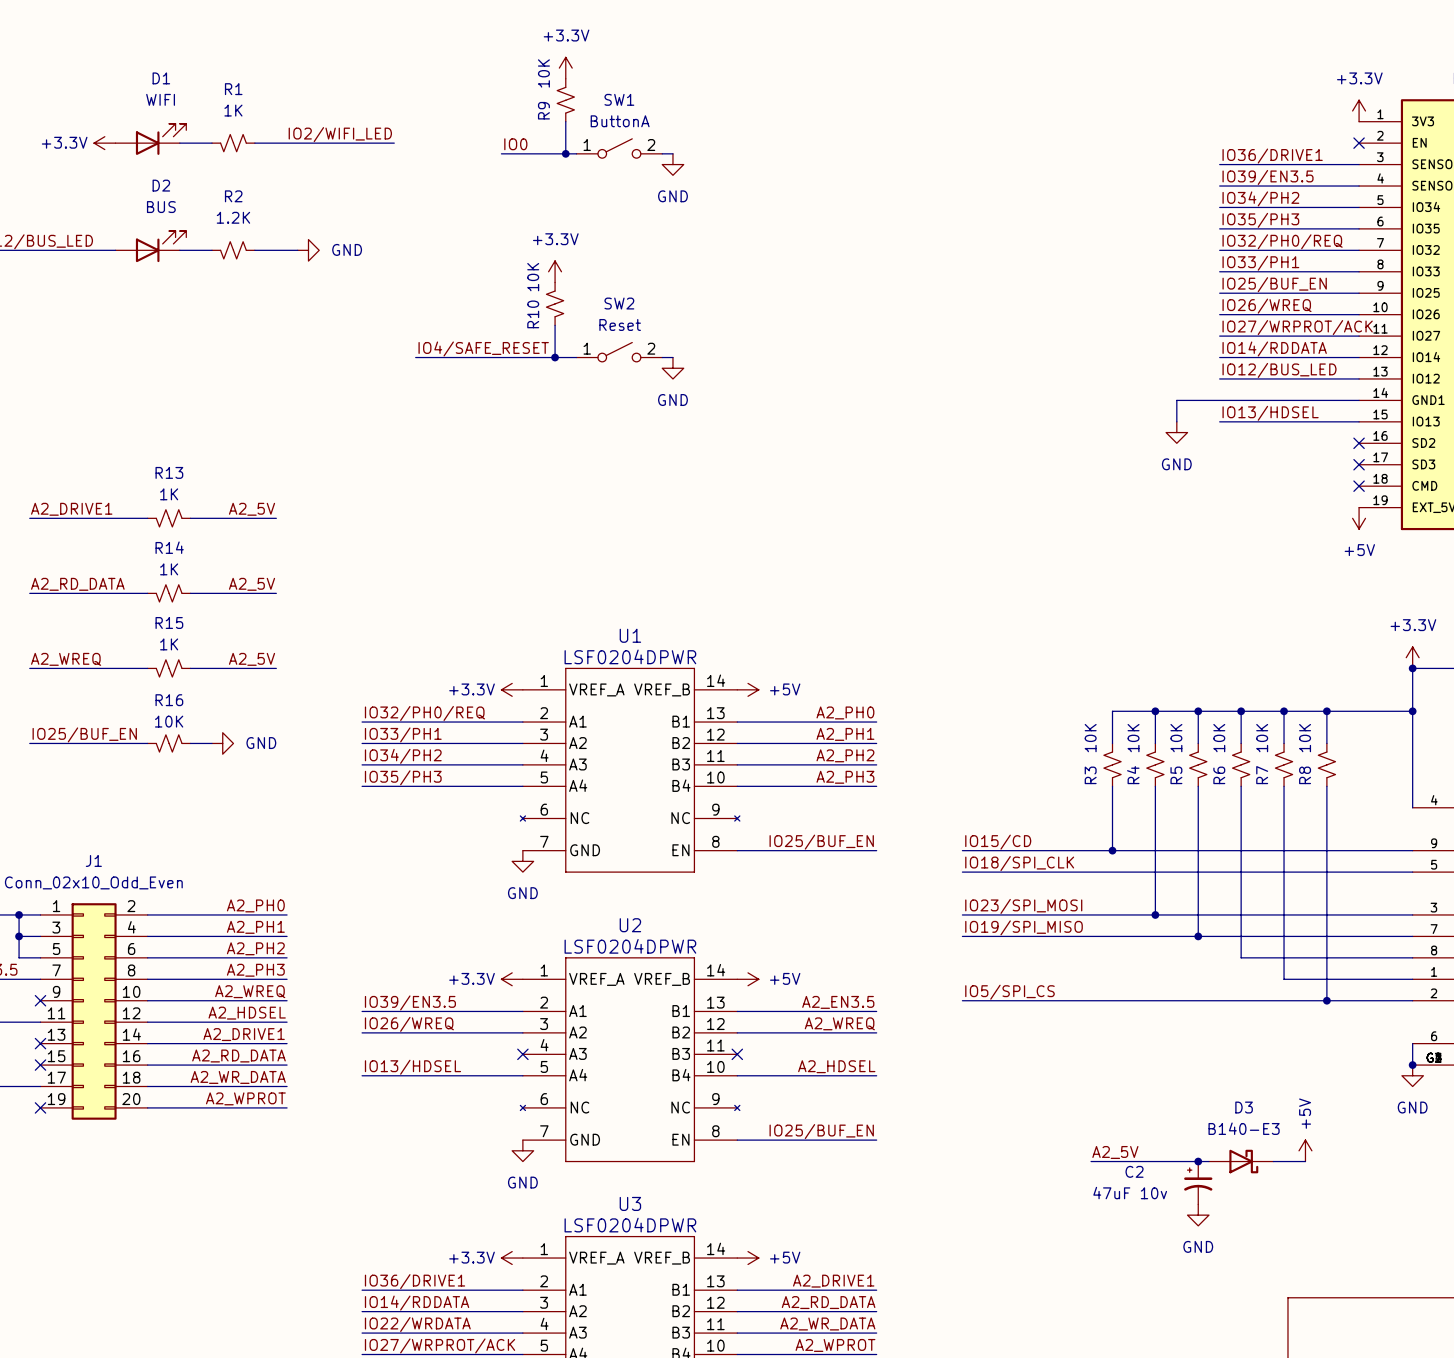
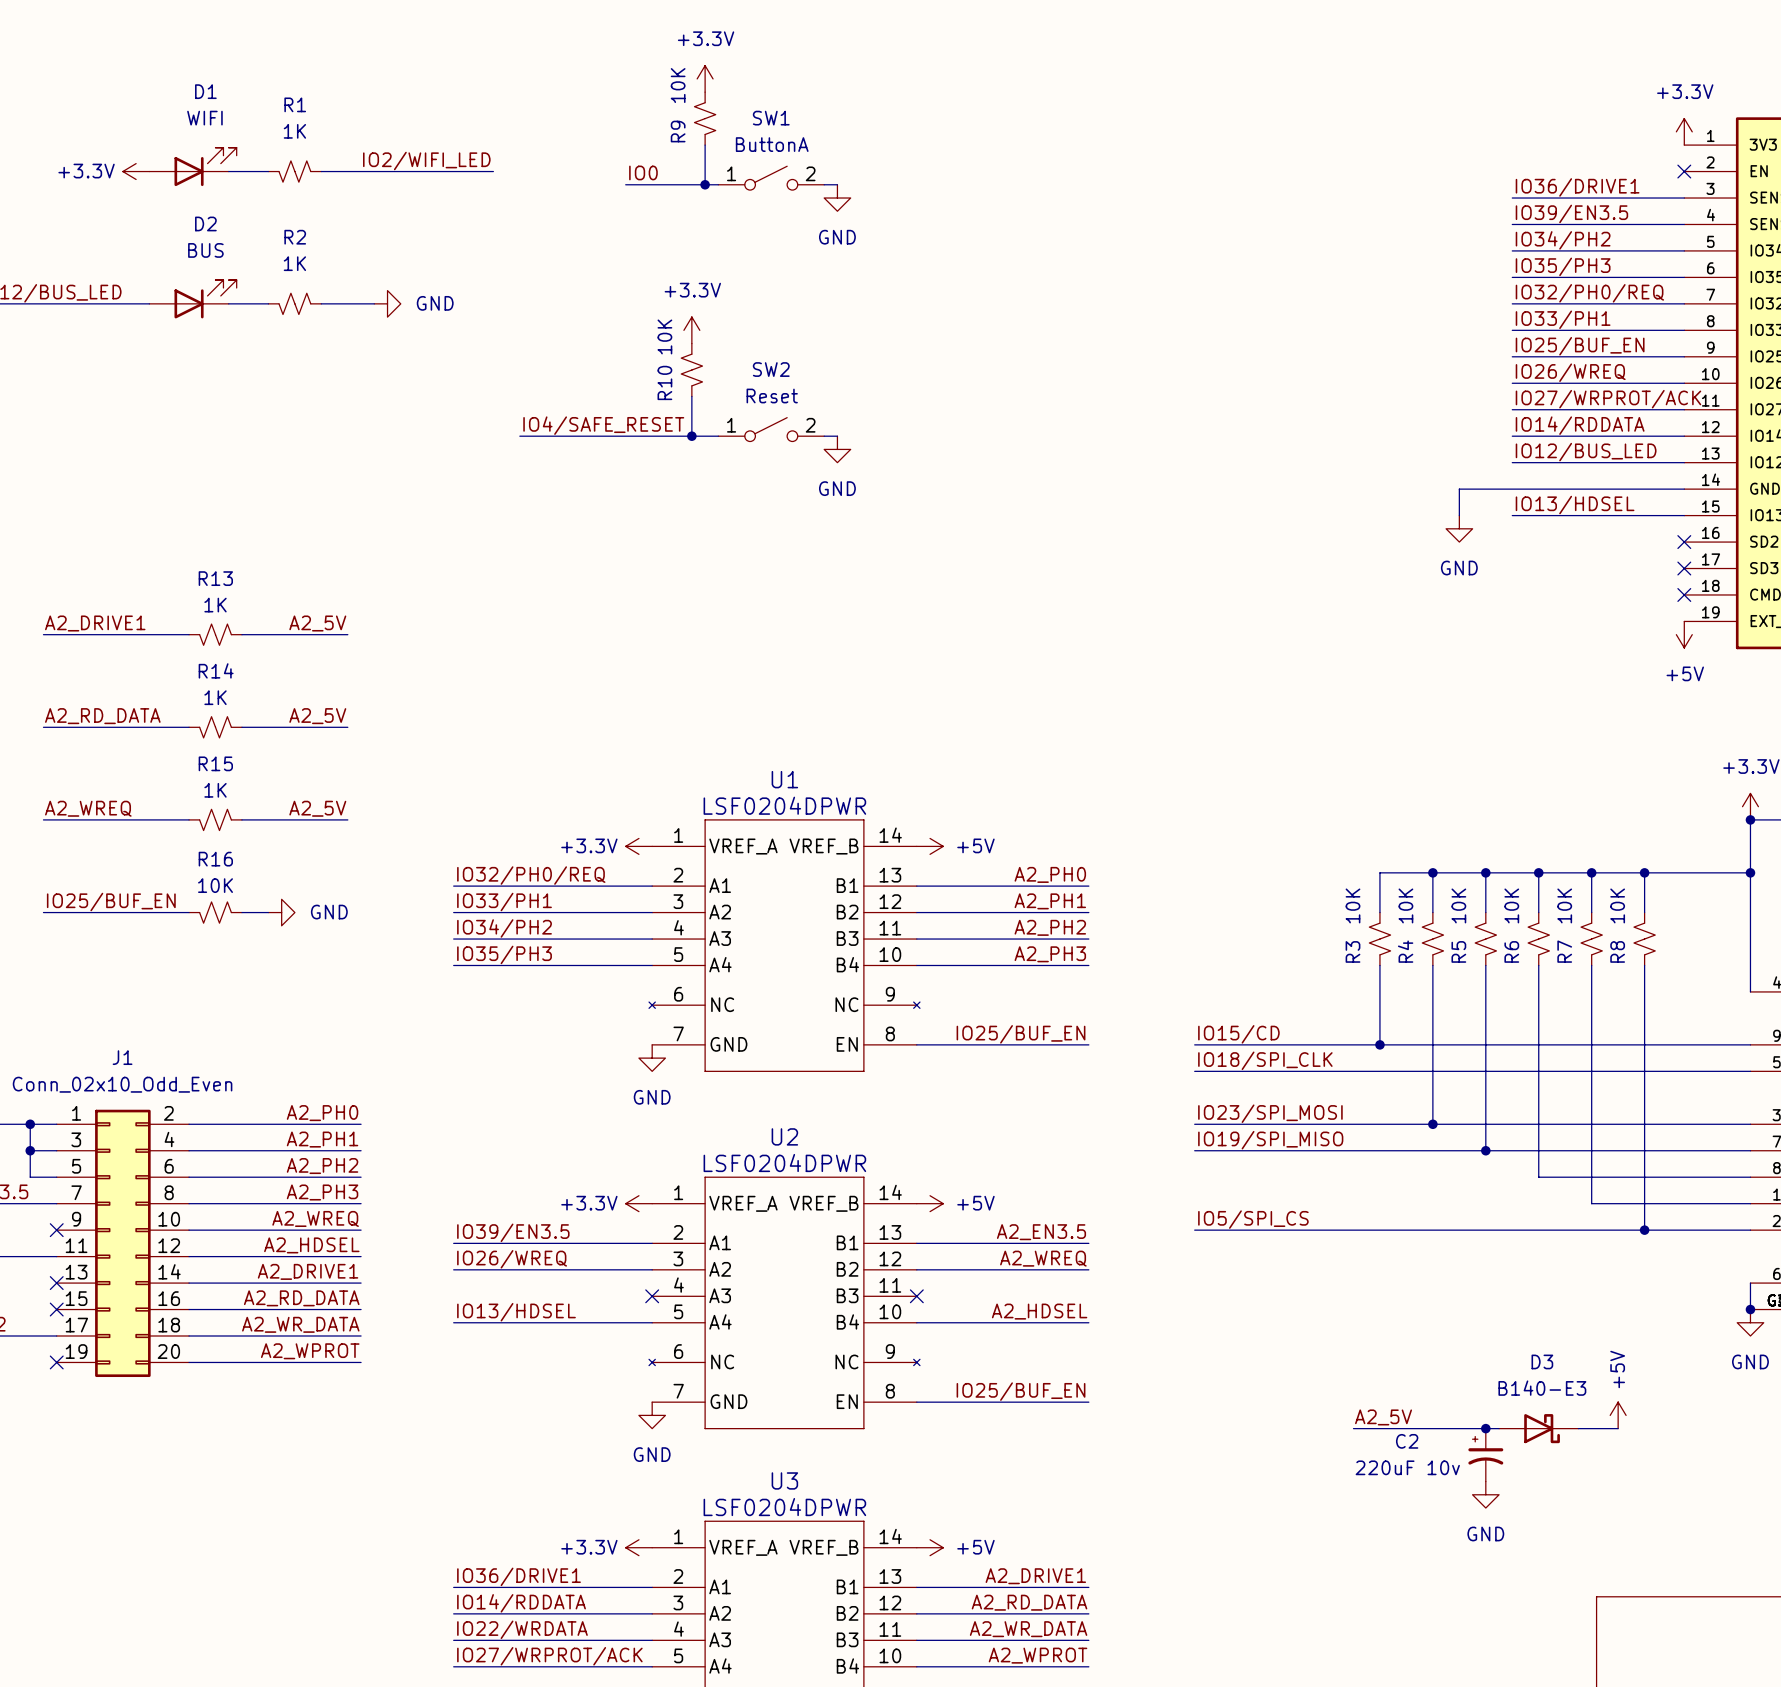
R2 value: 1.2K (233, 217) -> 1K (294, 263)
C2 value: 47uF 10v (1130, 1193) -> 220uF 10v (1407, 1467)

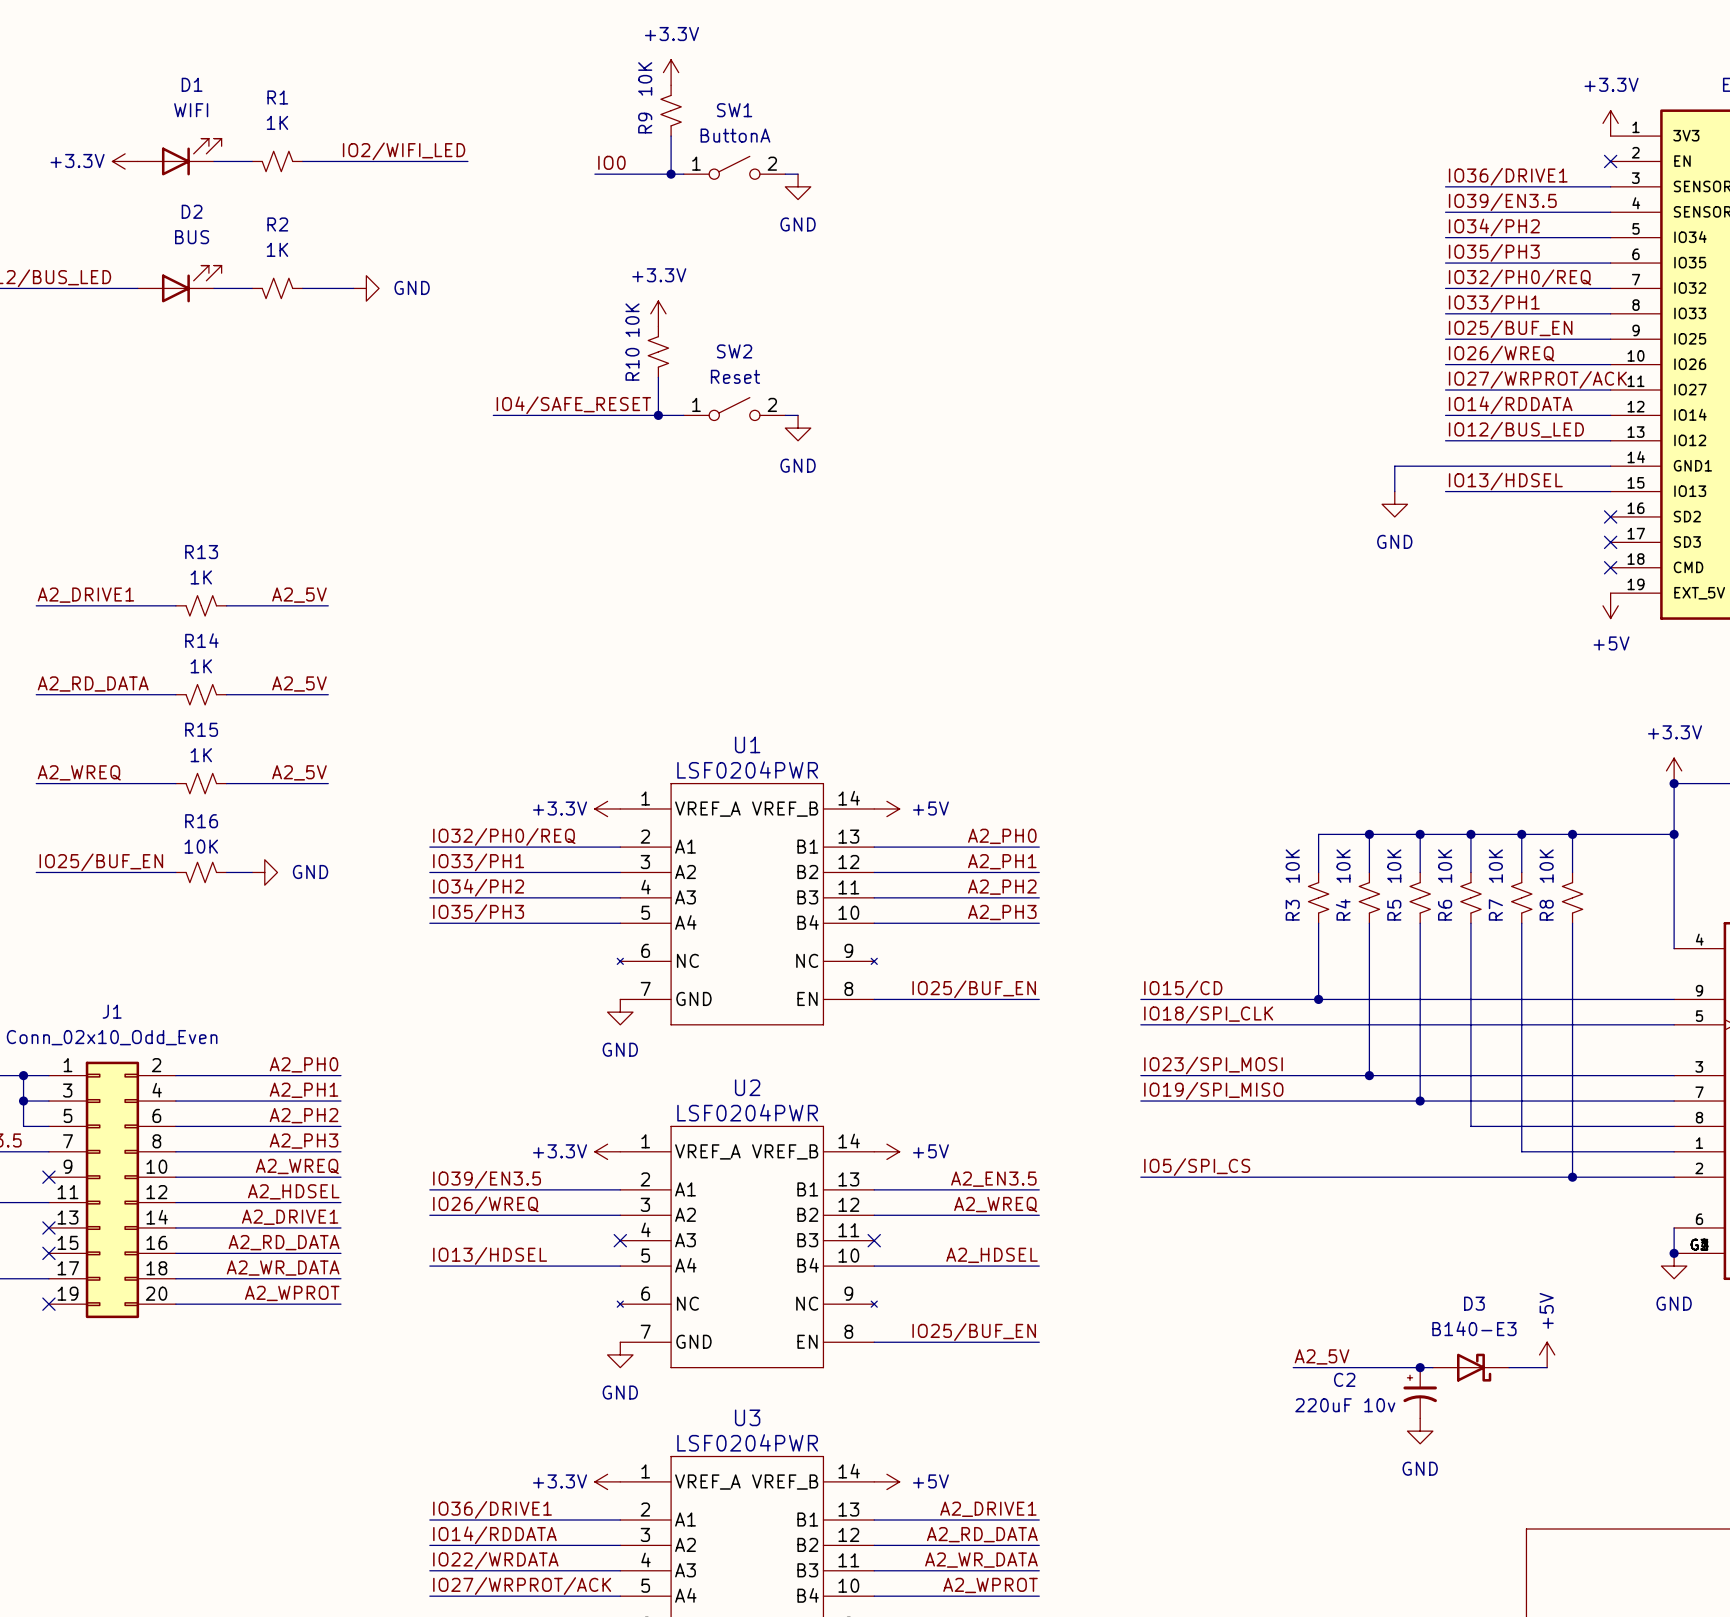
U1 value: LSF0204DPWR (784, 805) -> LSF0204PWR (747, 769)
U2 value: LSF0204DPWR (784, 1163) -> LSF0204PWR (747, 1112)
U3 value: LSF0204DPWR (784, 1507) -> LSF0204PWR (747, 1442)

